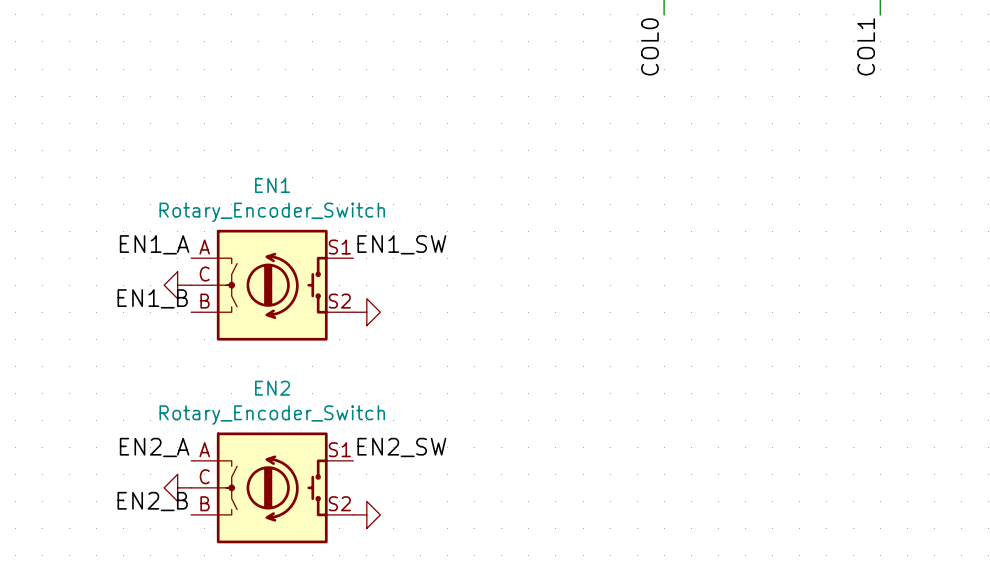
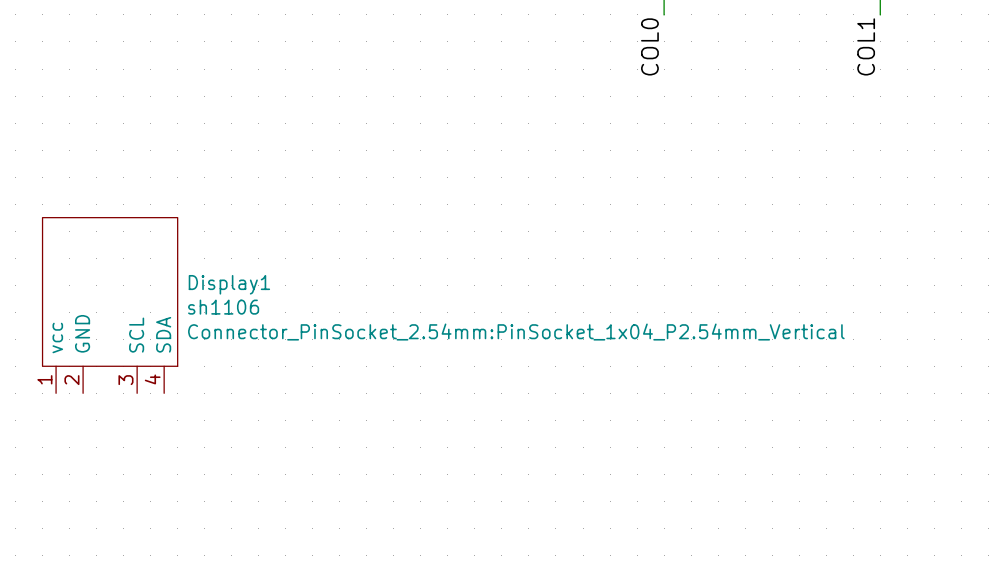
label: EN1_A (154, 244) -> none
label: EN1_SW (401, 244) -> none
power symbol: (177, 285) -> none
EN1: Rotary_Encoder_Switch (272, 285) -> none
label: EN1_B (152, 298) -> none
Display1: none -> sh1106 (110, 305)
power symbol: (366, 312) -> none
label: EN2_A (154, 447) -> none
label: EN2_SW (401, 447) -> none
power symbol: (177, 487) -> none
EN2: Rotary_Encoder_Switch (272, 487) -> none
label: EN2_B (152, 501) -> none
power symbol: (366, 514) -> none

